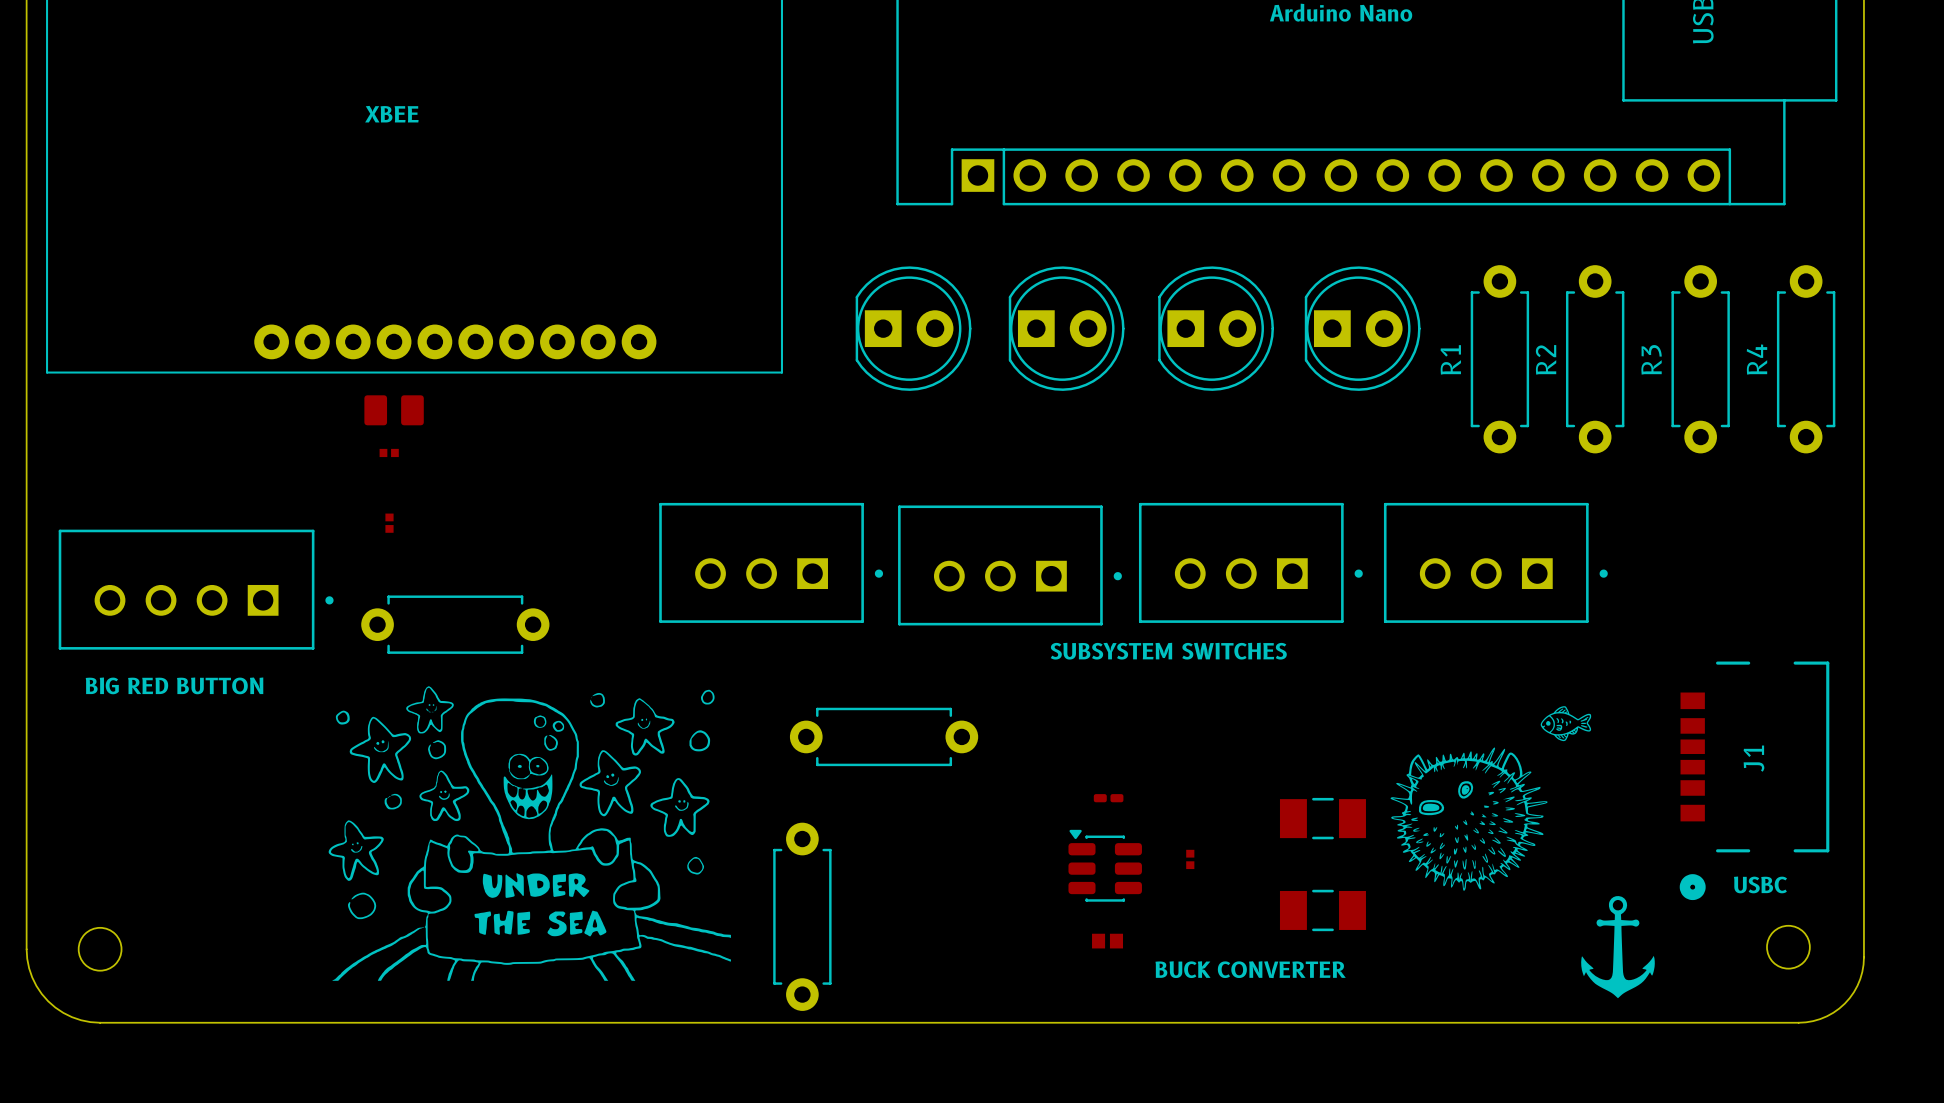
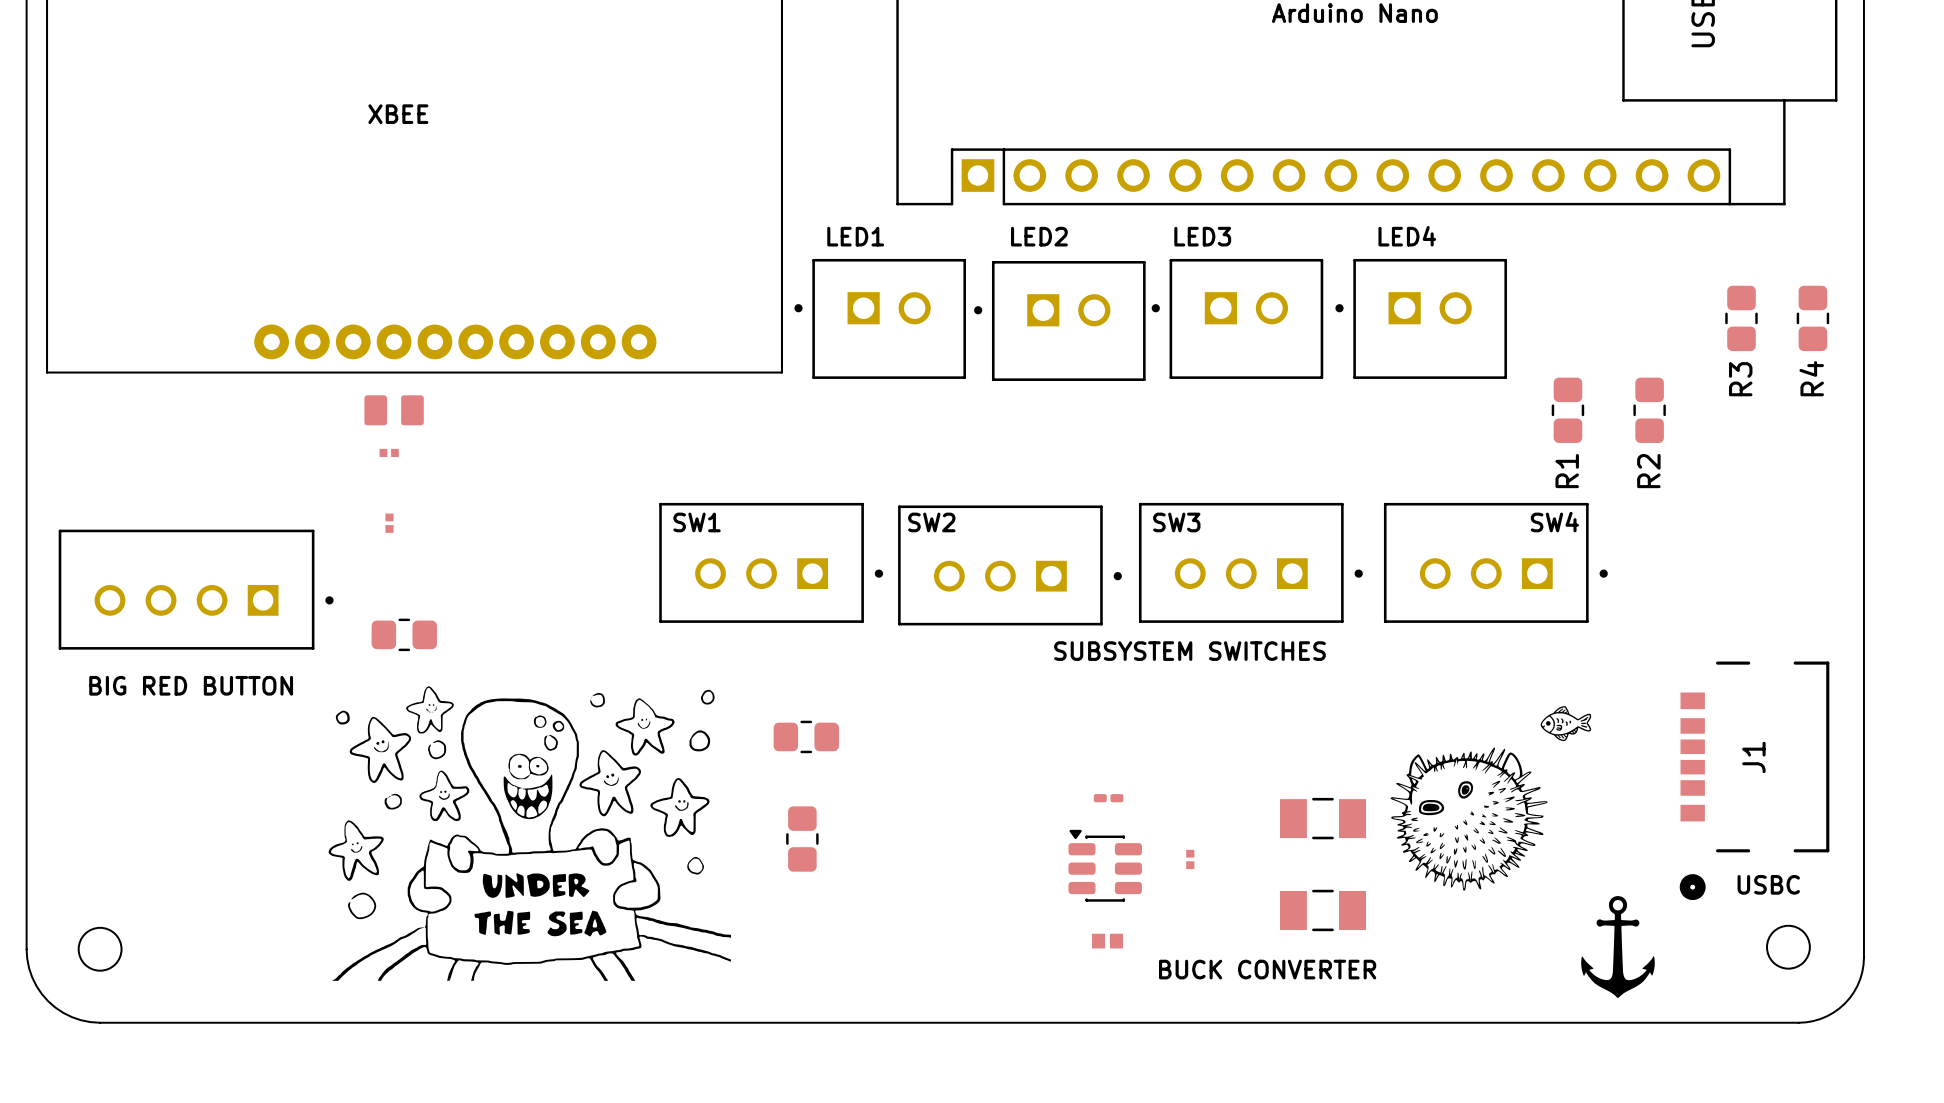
text: none -> LED1 (855, 236)
text: none -> LED2 (1039, 236)
text: none -> LED3 (1202, 236)
text: none -> LED4 (1407, 236)
R1 footprint: [1470, 265, 1530, 454] -> [1551, 377, 1585, 443]
R2 footprint: [1565, 265, 1625, 454] -> [1633, 377, 1666, 443]
R3 footprint: [1671, 265, 1730, 454] -> [1725, 285, 1758, 352]
R4 footprint: [1776, 265, 1836, 454] -> [1796, 285, 1830, 352]
part footprint: [1008, 266, 1125, 391] -> [974, 261, 1146, 381]
part: none -> (880, 318)
part: none -> (1237, 318)
part: none -> (1421, 318)
part: (913, 328) -> none
part: (1216, 328) -> none
part: (1362, 328) -> none
R1 name position: R1 (1450, 359) -> R1 (1567, 471)
R2 name position: R2 (1546, 359) -> R2 (1648, 471)
R3 name position: R3 (1651, 359) -> R3 (1740, 379)
R4 name position: R4 (1756, 359) -> R4 (1811, 378)
text: none -> SW1 (697, 522)
text: none -> SW2 (931, 522)
text: none -> SW3 (1176, 522)
text: none -> SW4 (1554, 522)
part: (455, 624) -> none
part: none -> (404, 634)
part: none -> (806, 736)
part: (884, 736) -> none
part: none -> (802, 839)
part: (802, 916) -> none

